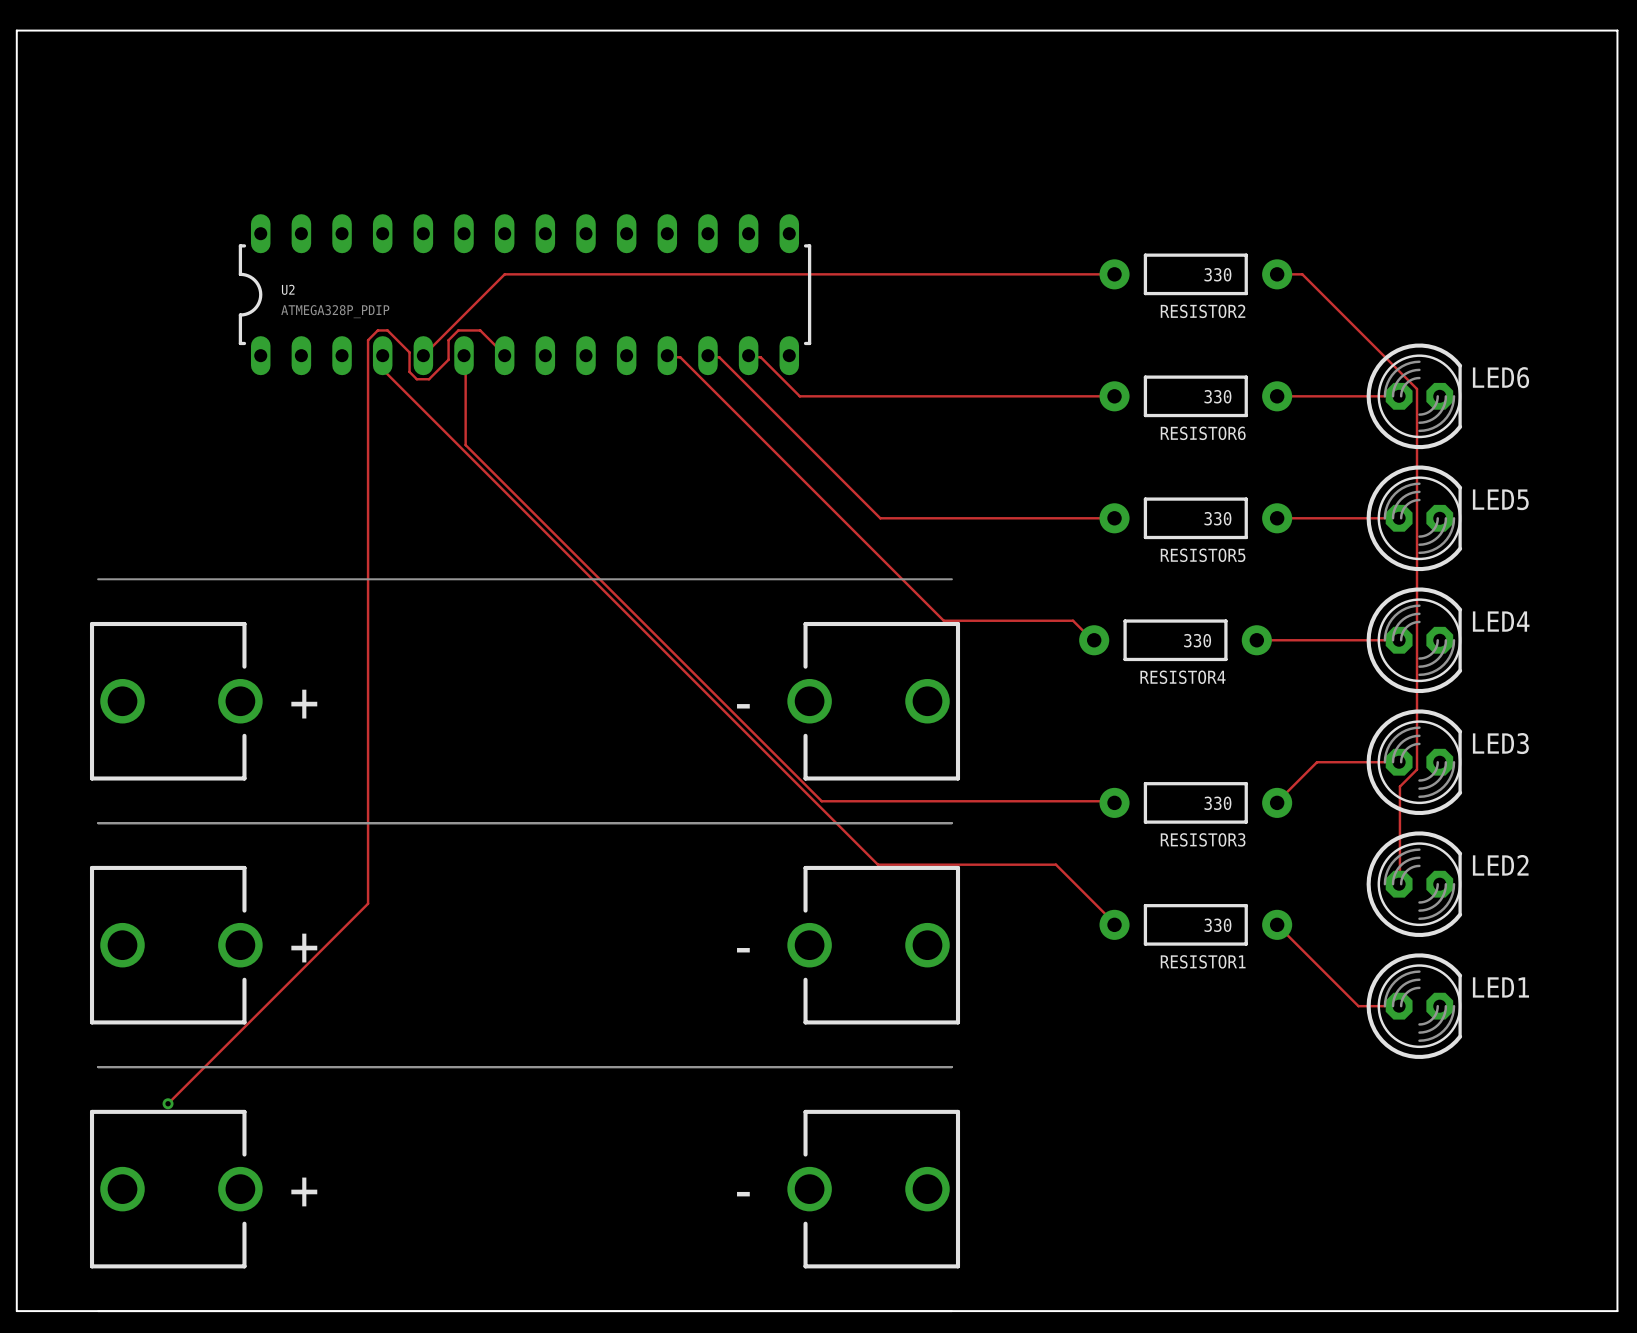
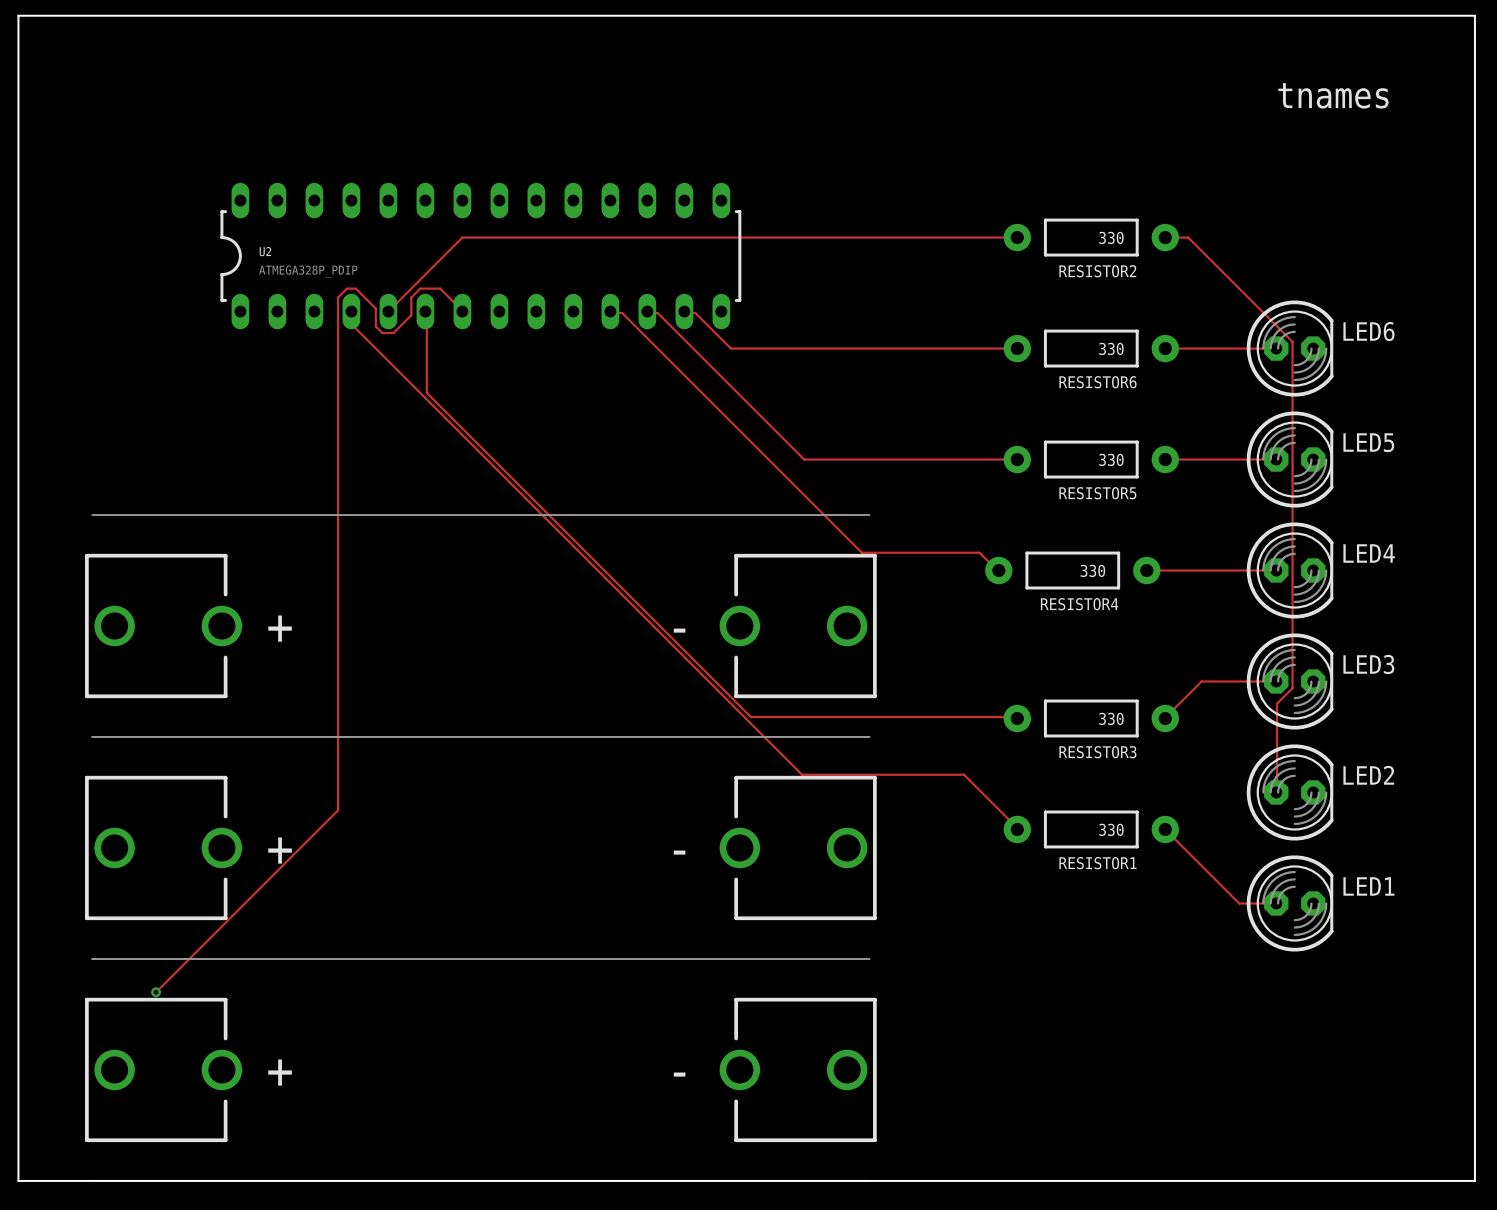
text: none -> tnames (1333, 95)

